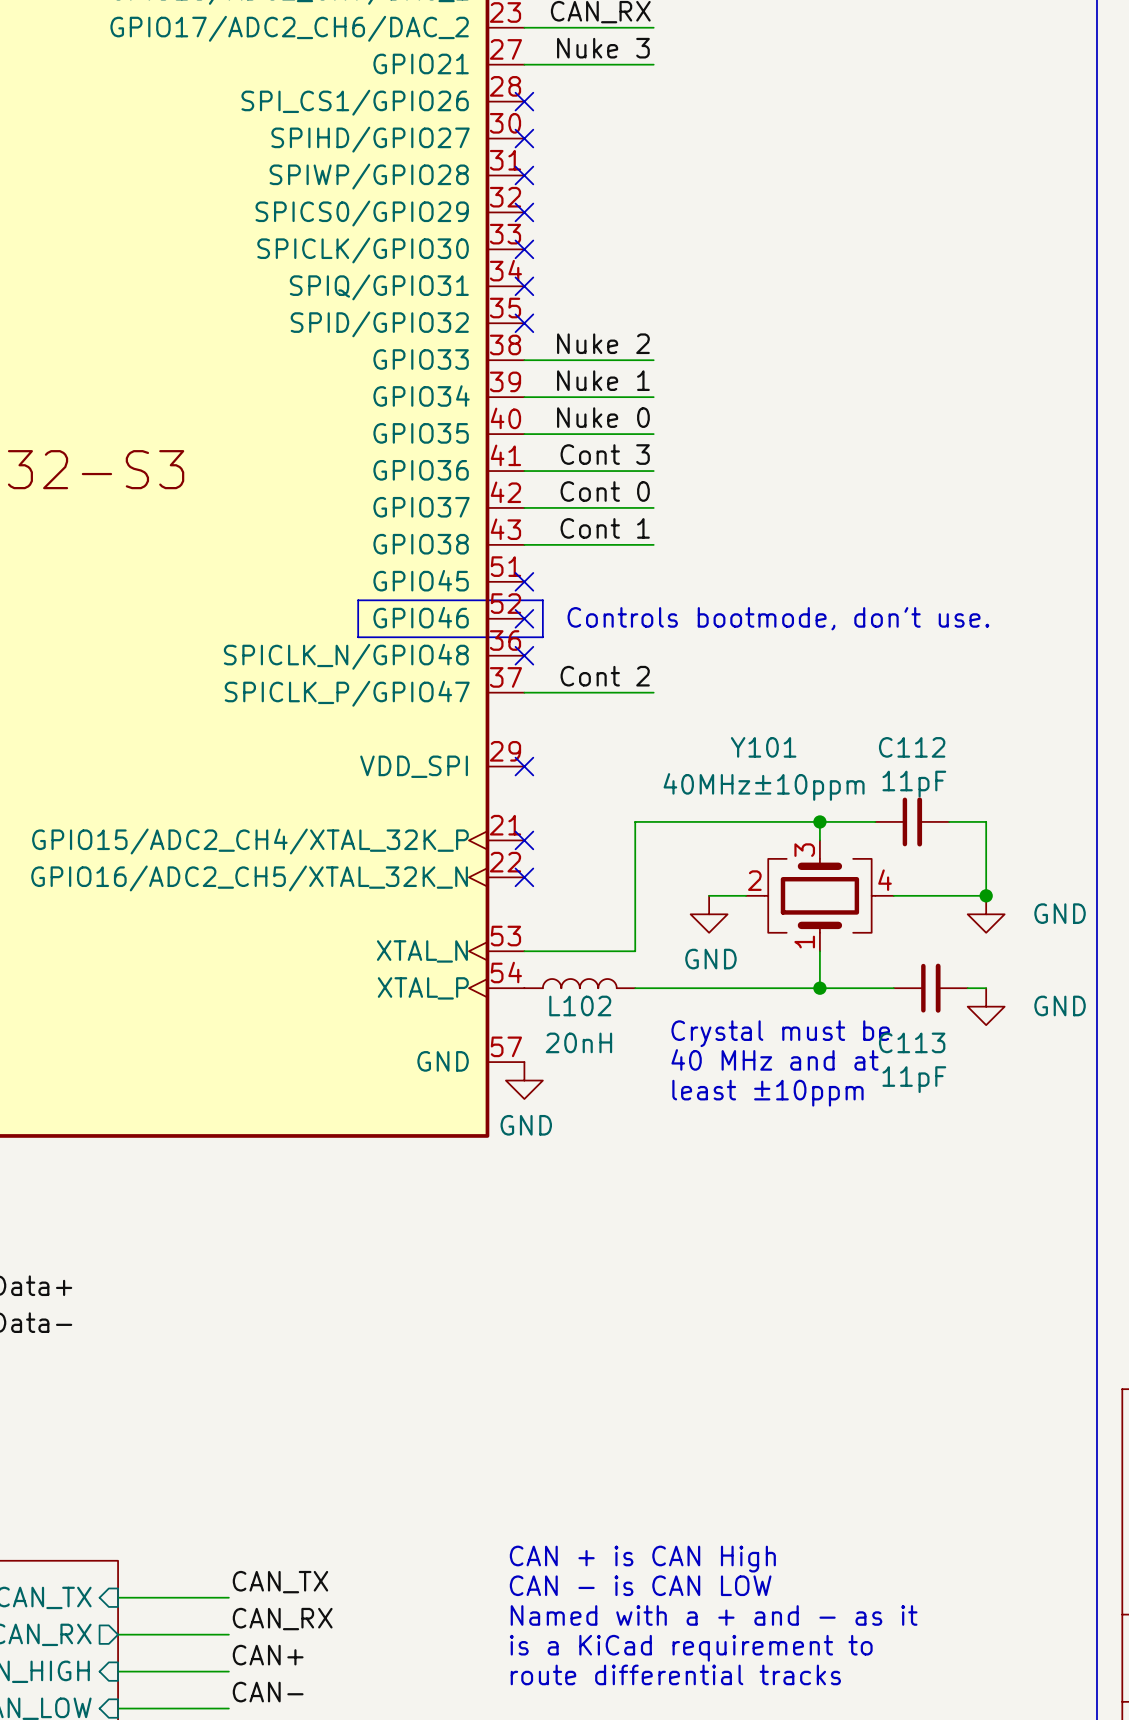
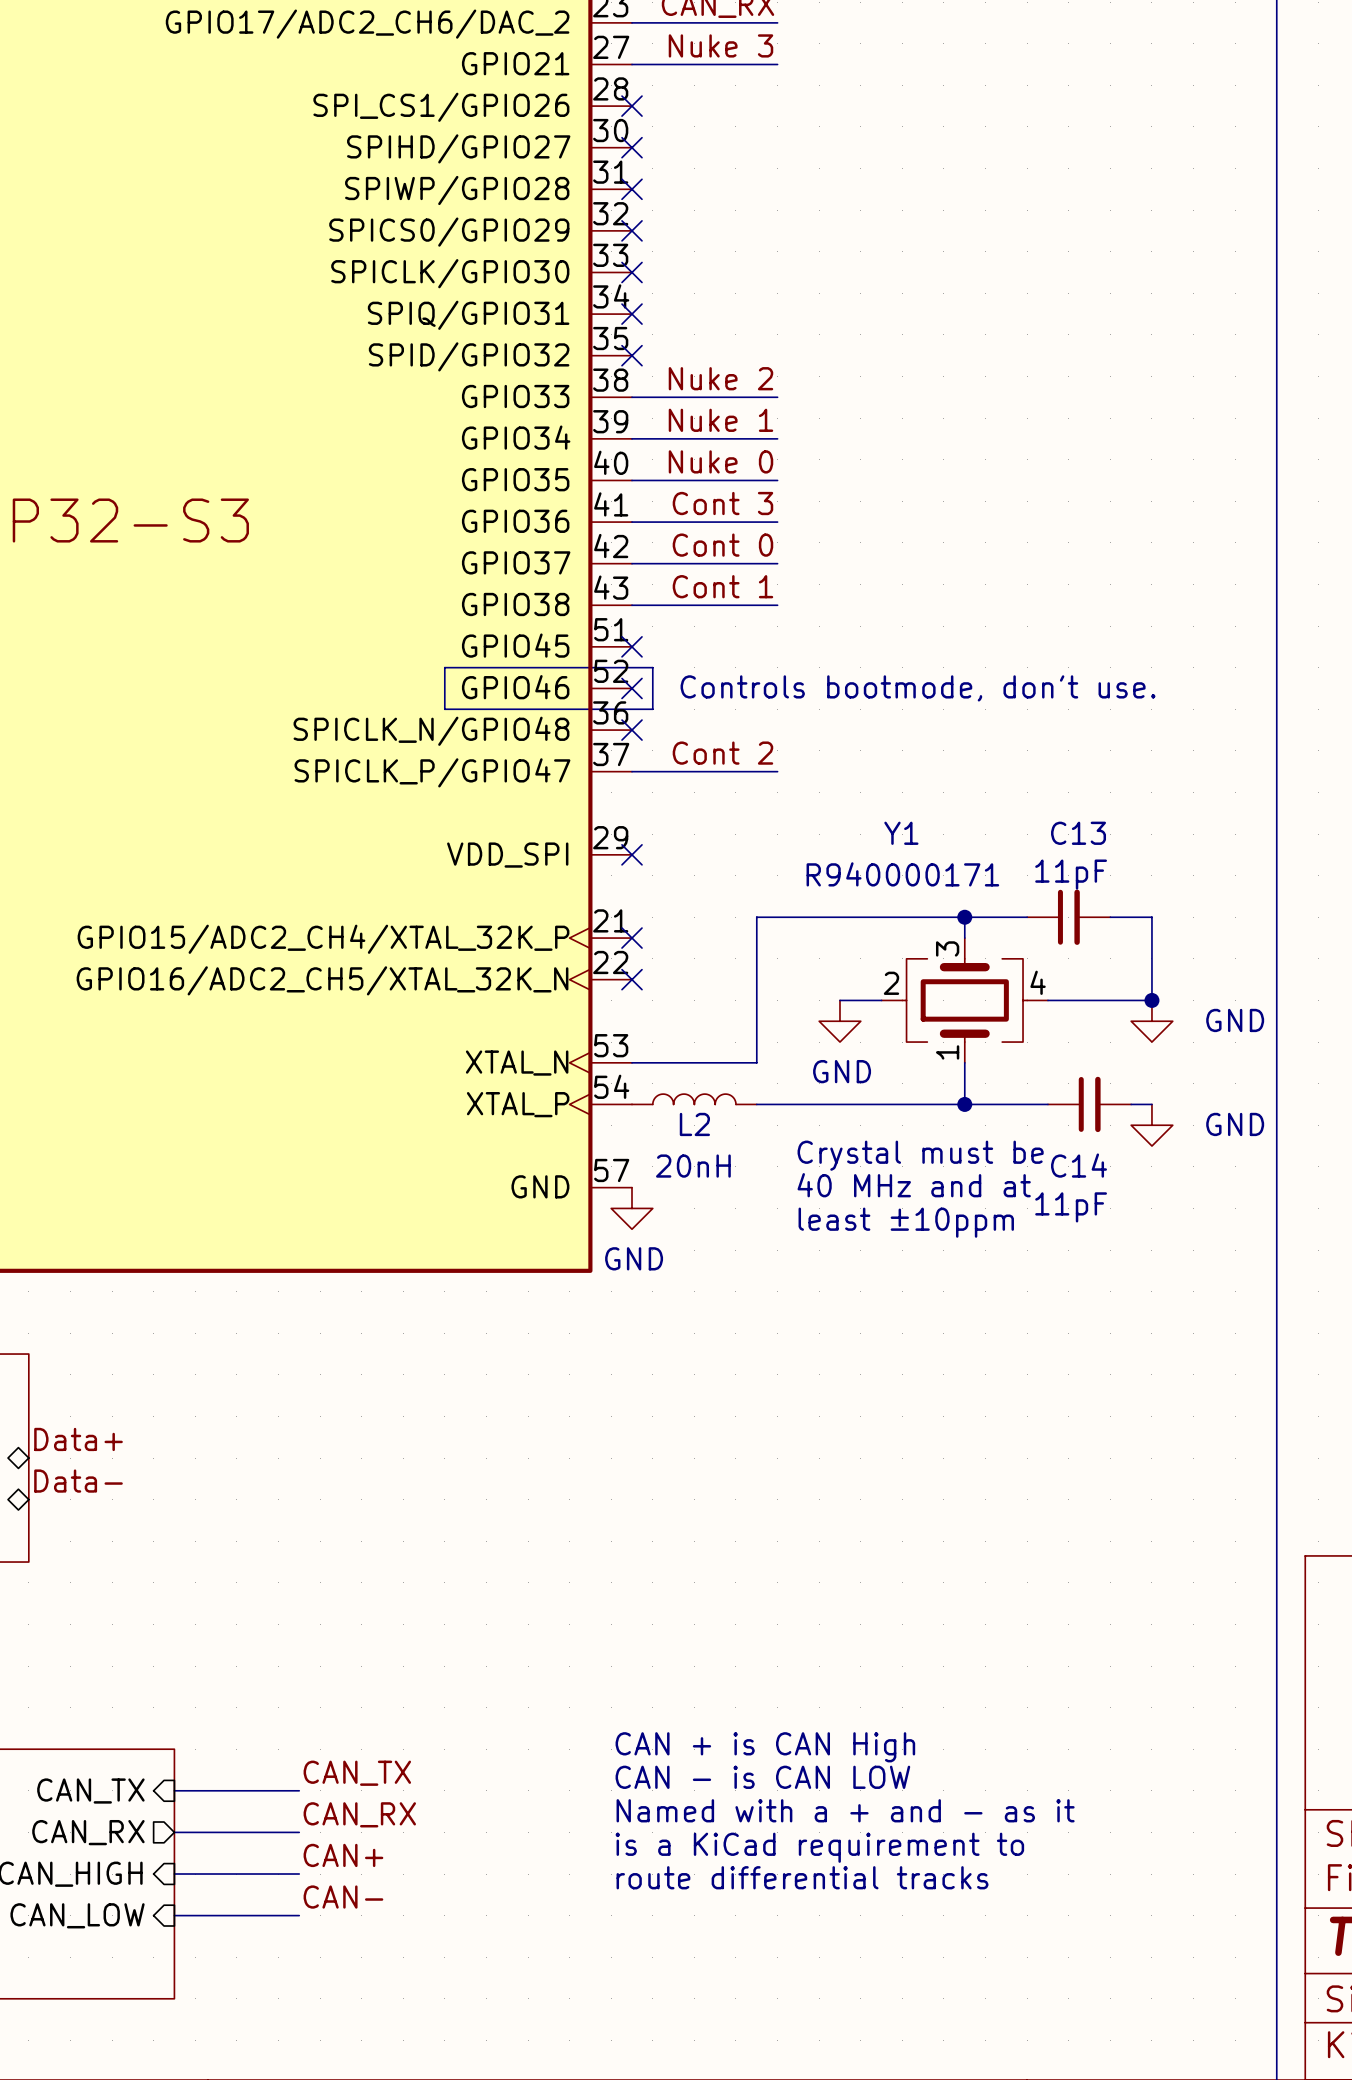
Y101 name: Y101 (763, 747) -> Y1 (901, 833)
C112 name: C112 (912, 747) -> C13 (1078, 833)
Y101 value: 40MHz±10ppm (764, 786) -> R940000171 (902, 874)
L102 name: L102 (580, 1005) -> L2 (694, 1124)
C113 name: C113 (912, 1042) -> C14 (1079, 1165)

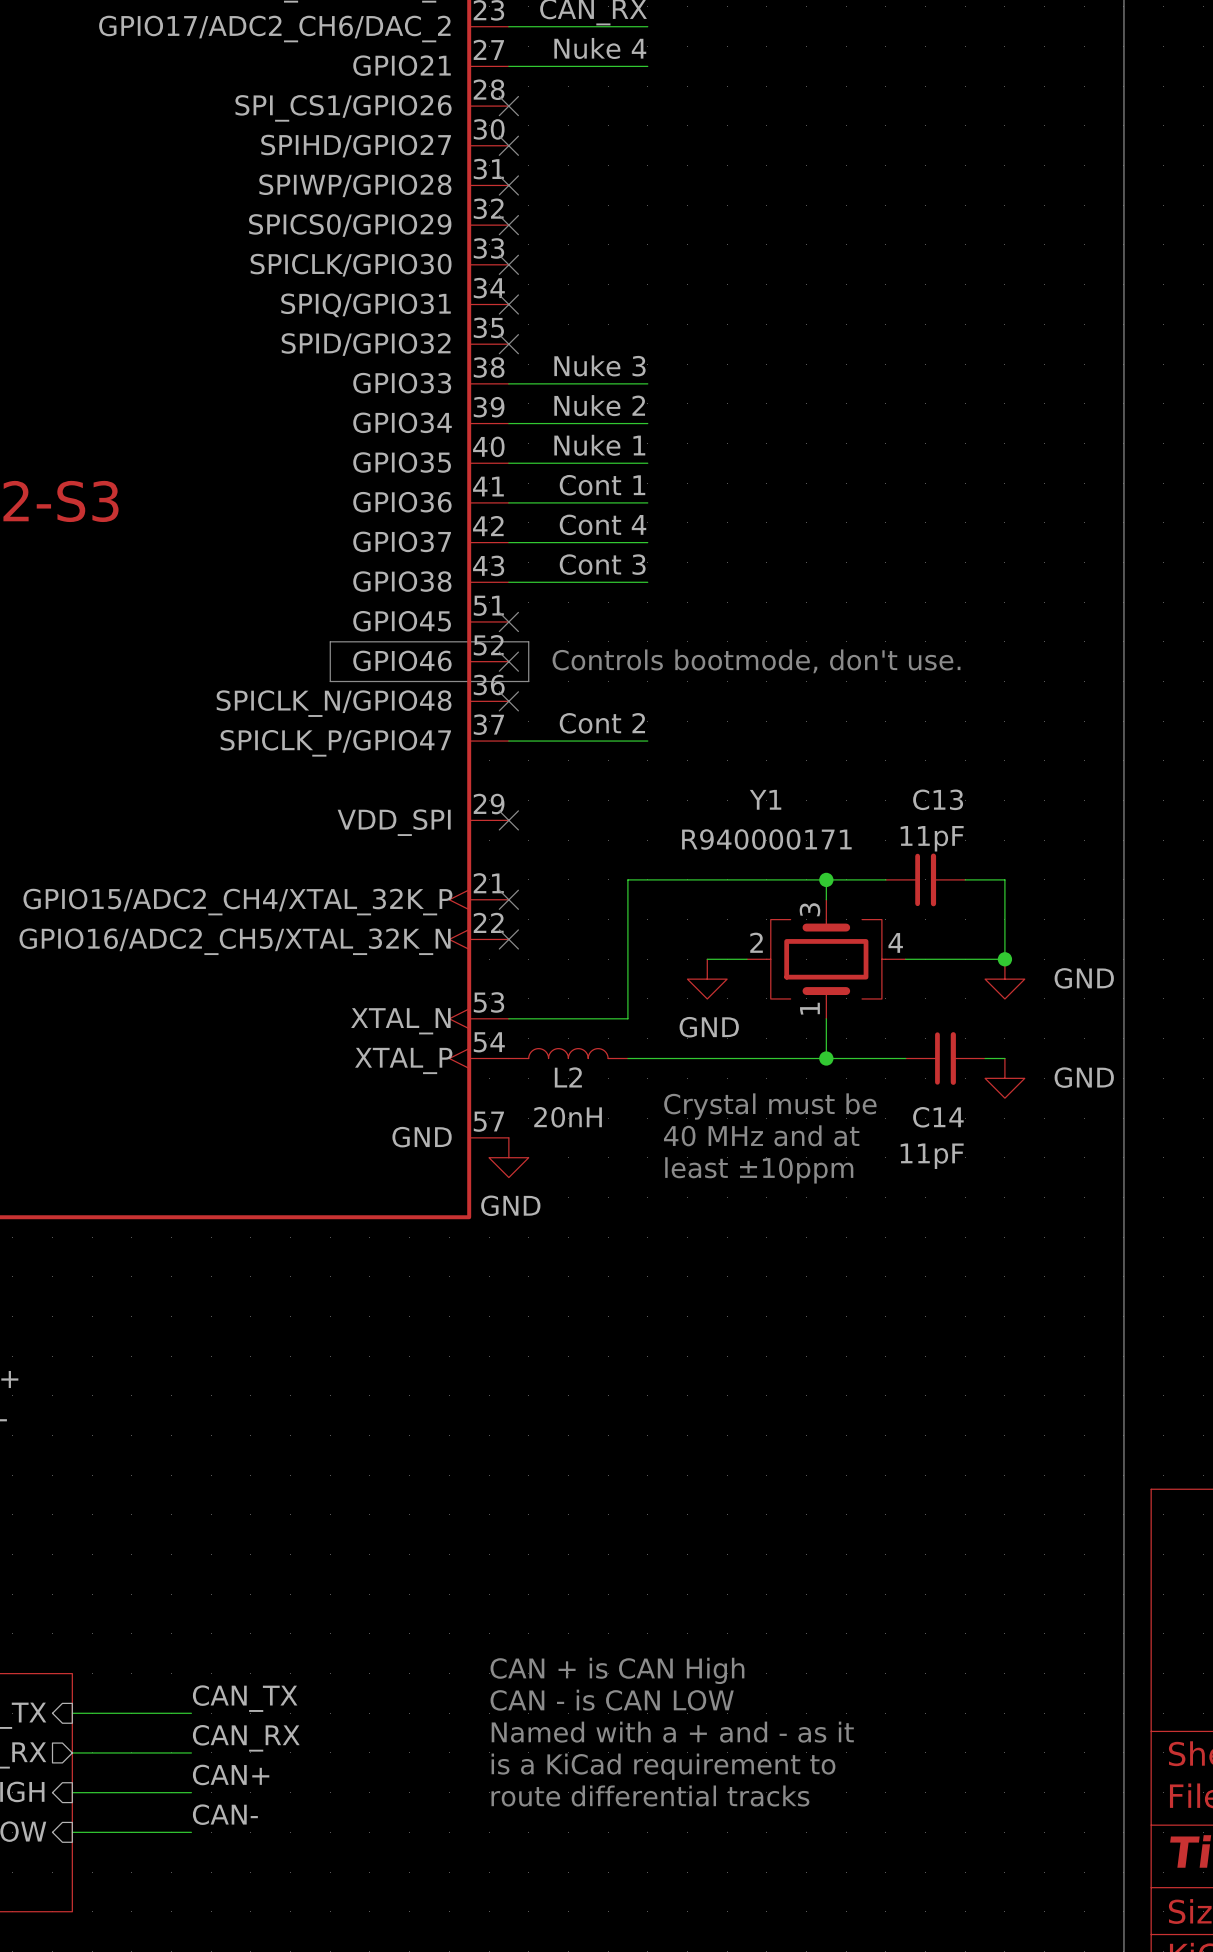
label: Nuke 3 (720, 45) -> Nuke 4 (600, 48)
label: Nuke 2 (720, 378) -> Nuke 3 (599, 365)
label: Nuke 1 (720, 420) -> Nuke 2 (599, 405)
label: Nuke 0 (720, 461) -> Nuke 1 (599, 445)
label: Cont 3 (722, 503) -> Cont 1 (602, 485)
label: Cont 0 (722, 545) -> Cont 4 (602, 524)
label: Cont 1 (722, 586) -> Cont 3 (602, 564)

